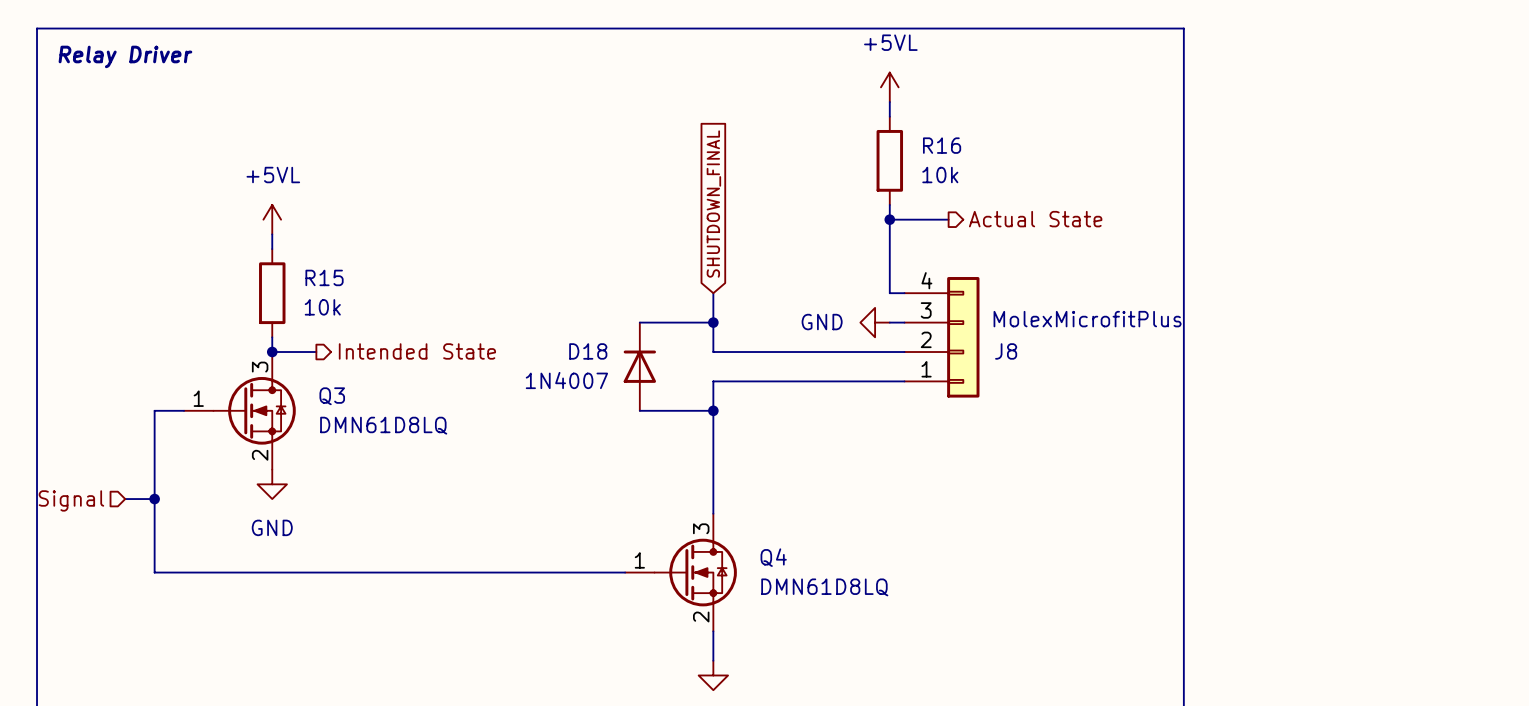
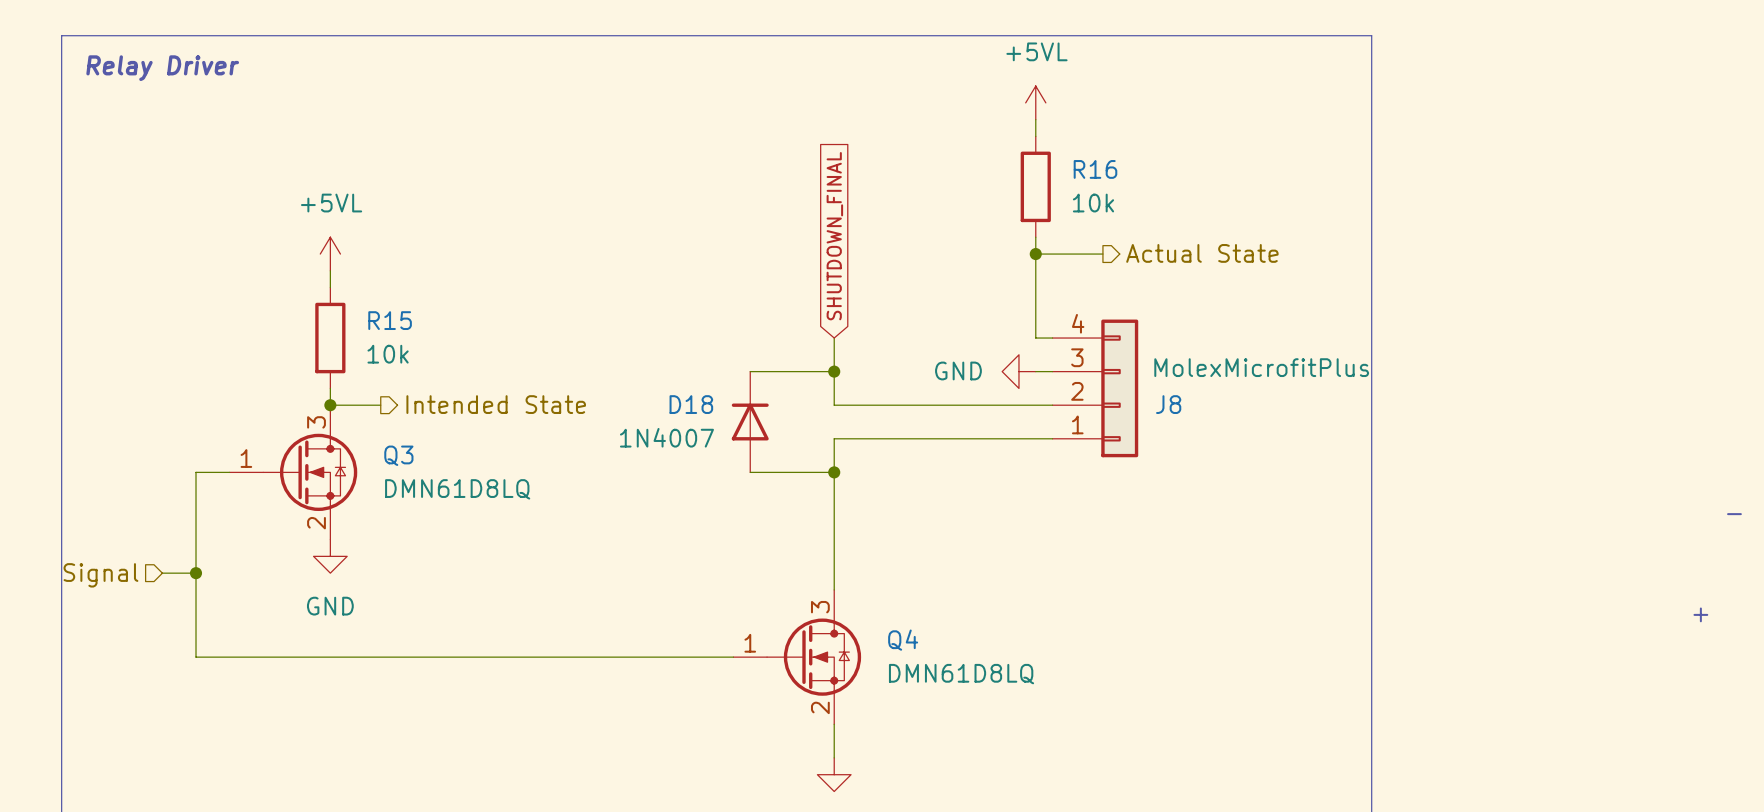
text: none -> - (1734, 514)
text: none -> + (1700, 614)

